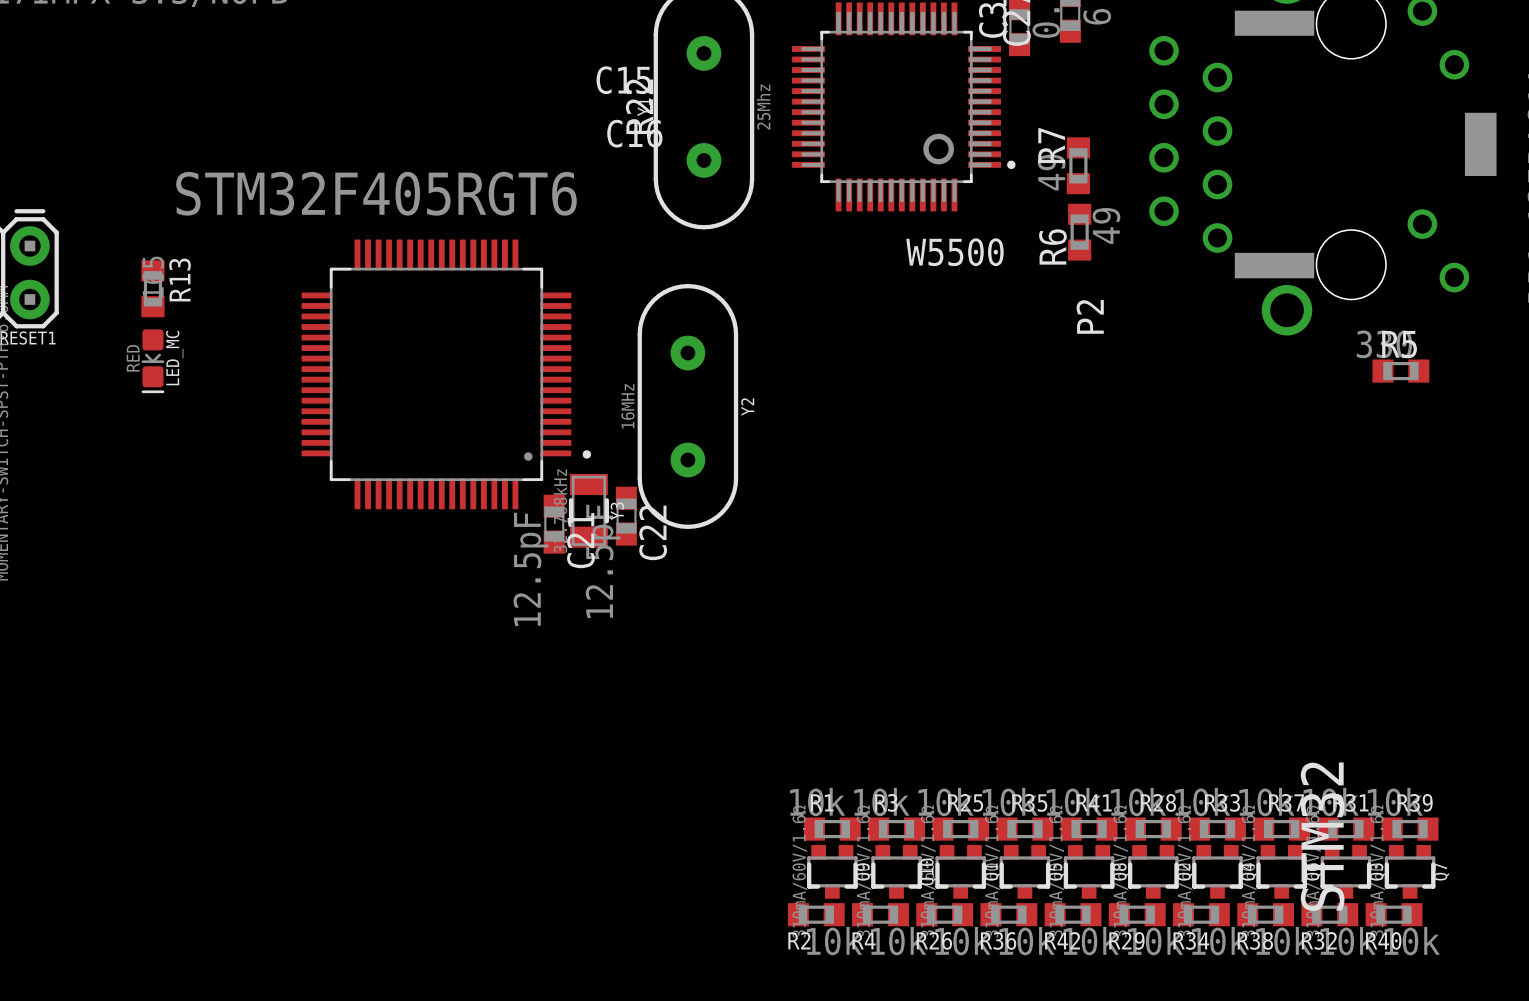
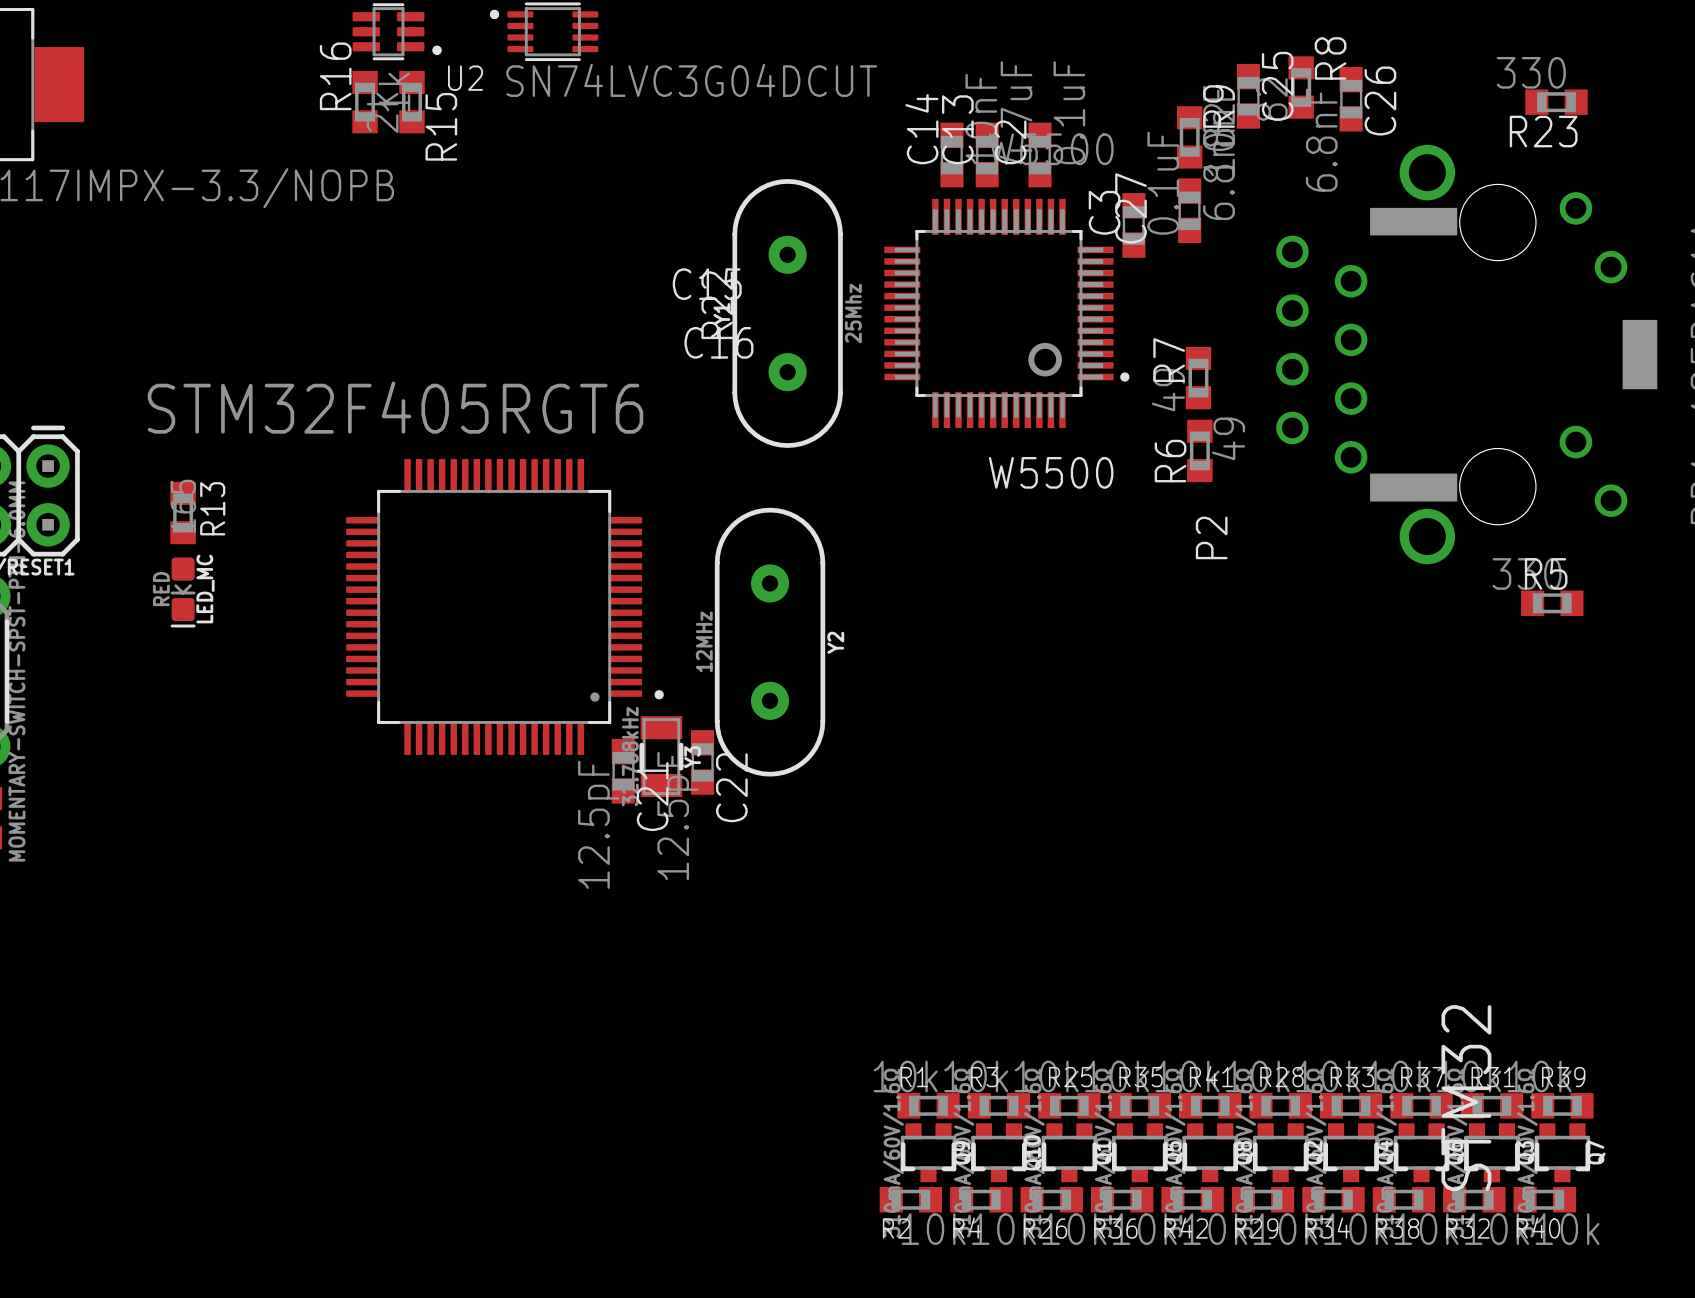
Y2 value: 16MHz (628, 406) -> 12MHz (704, 641)

